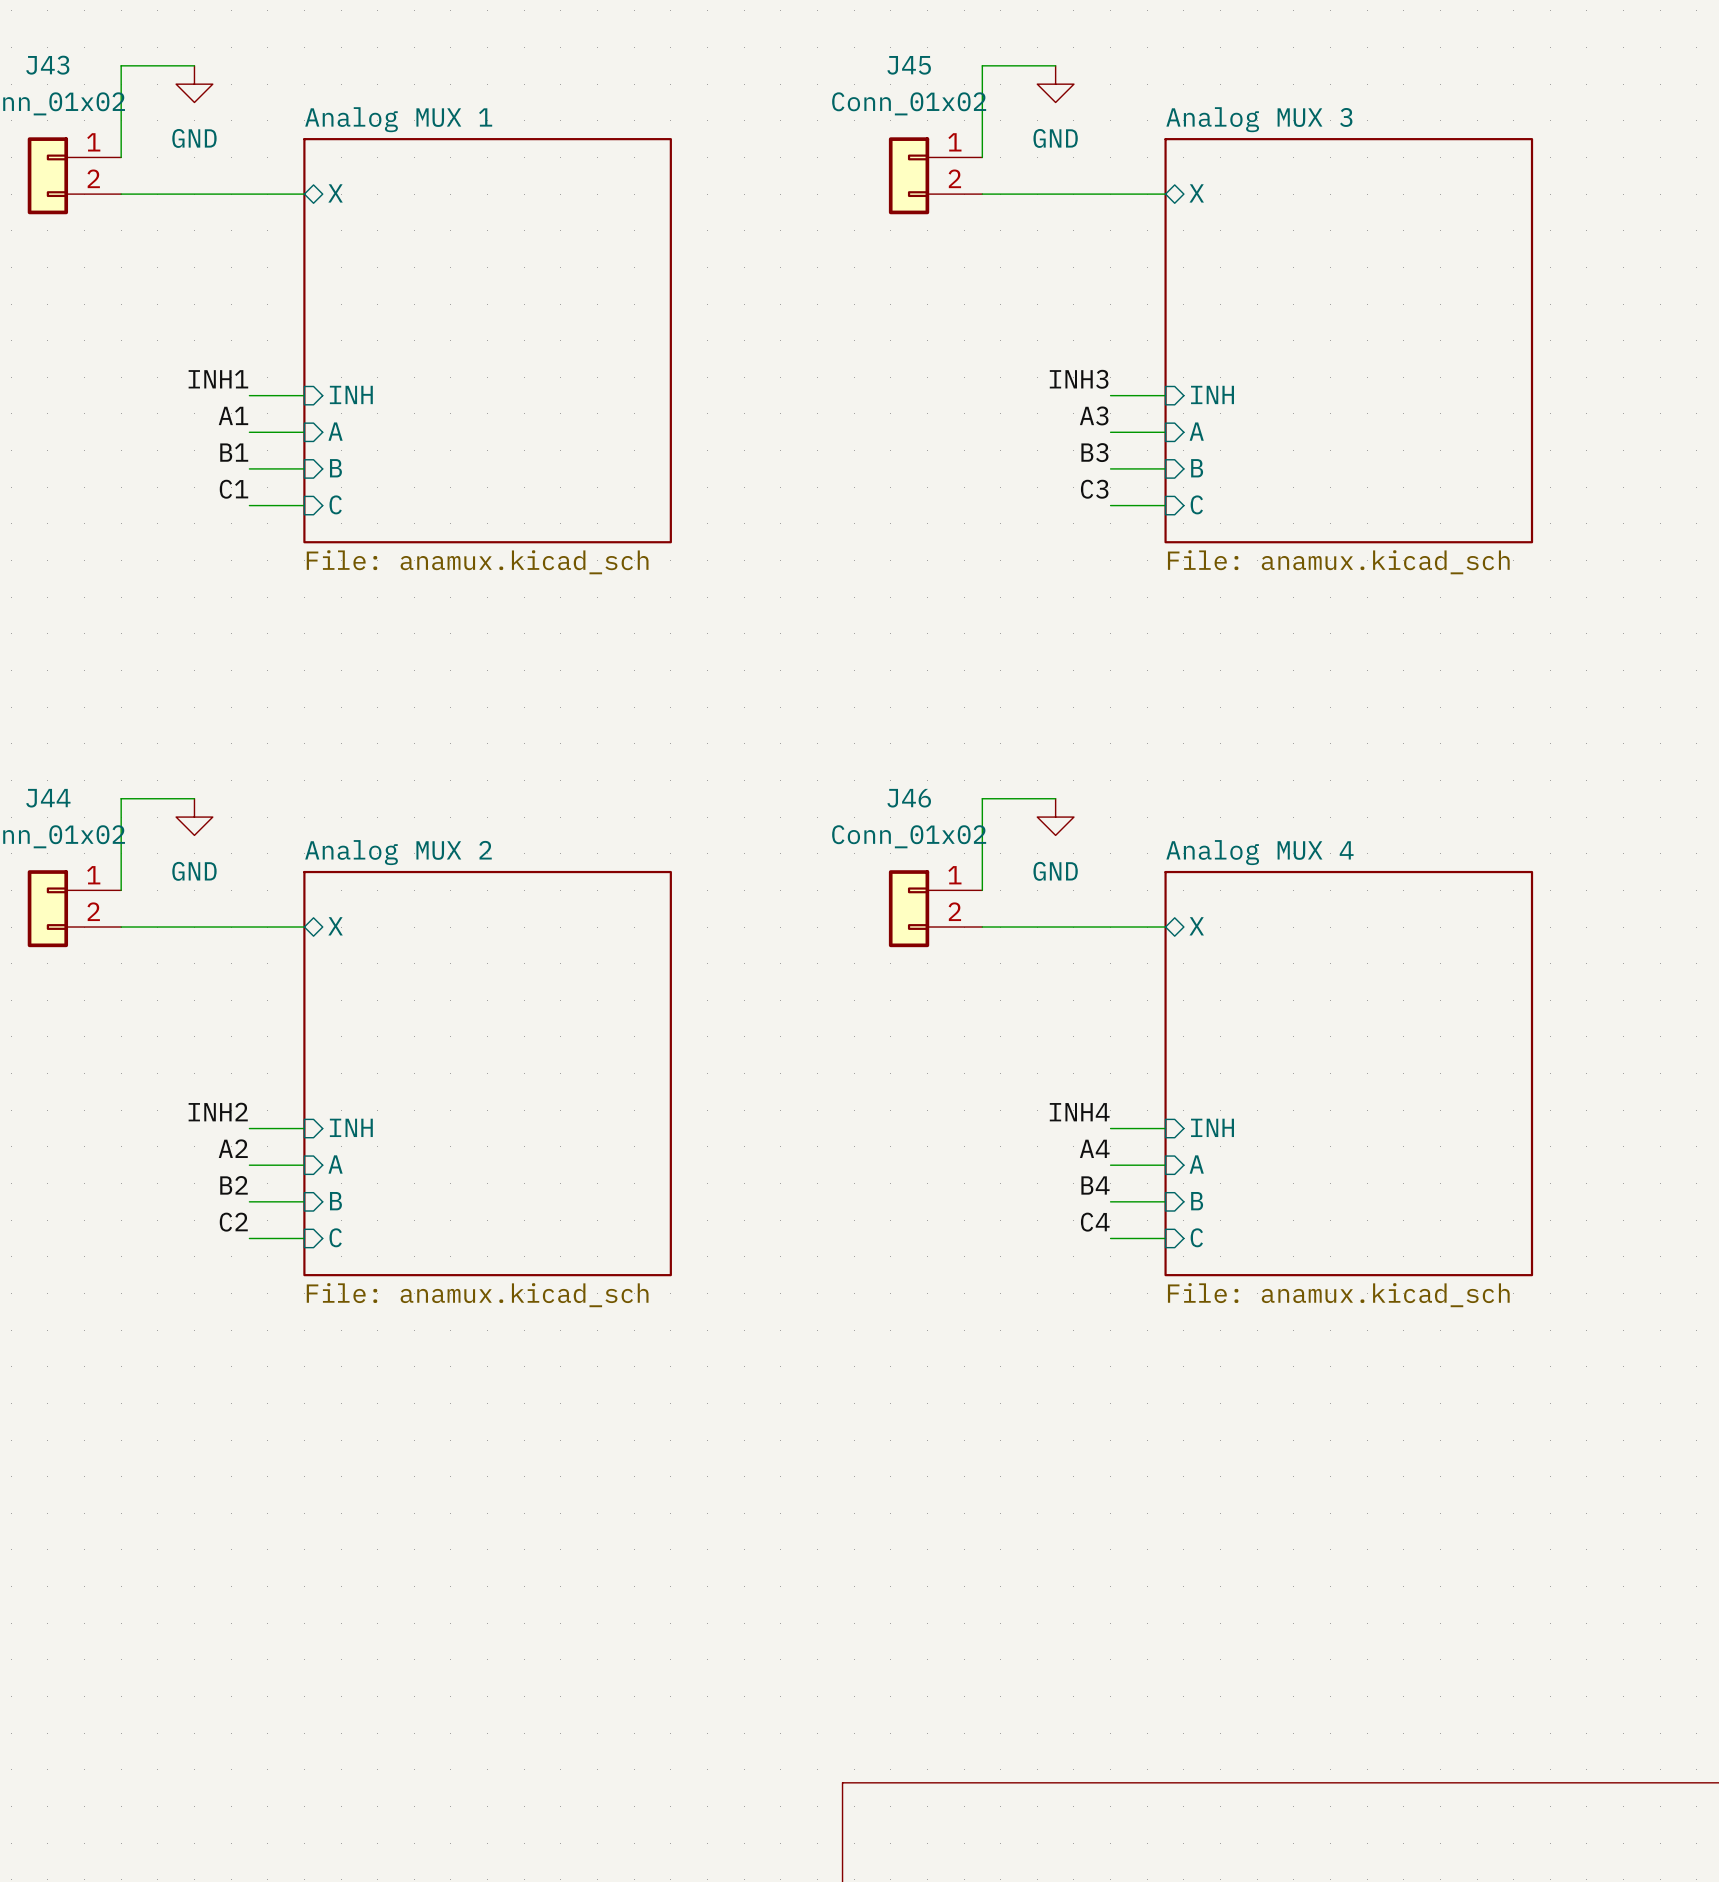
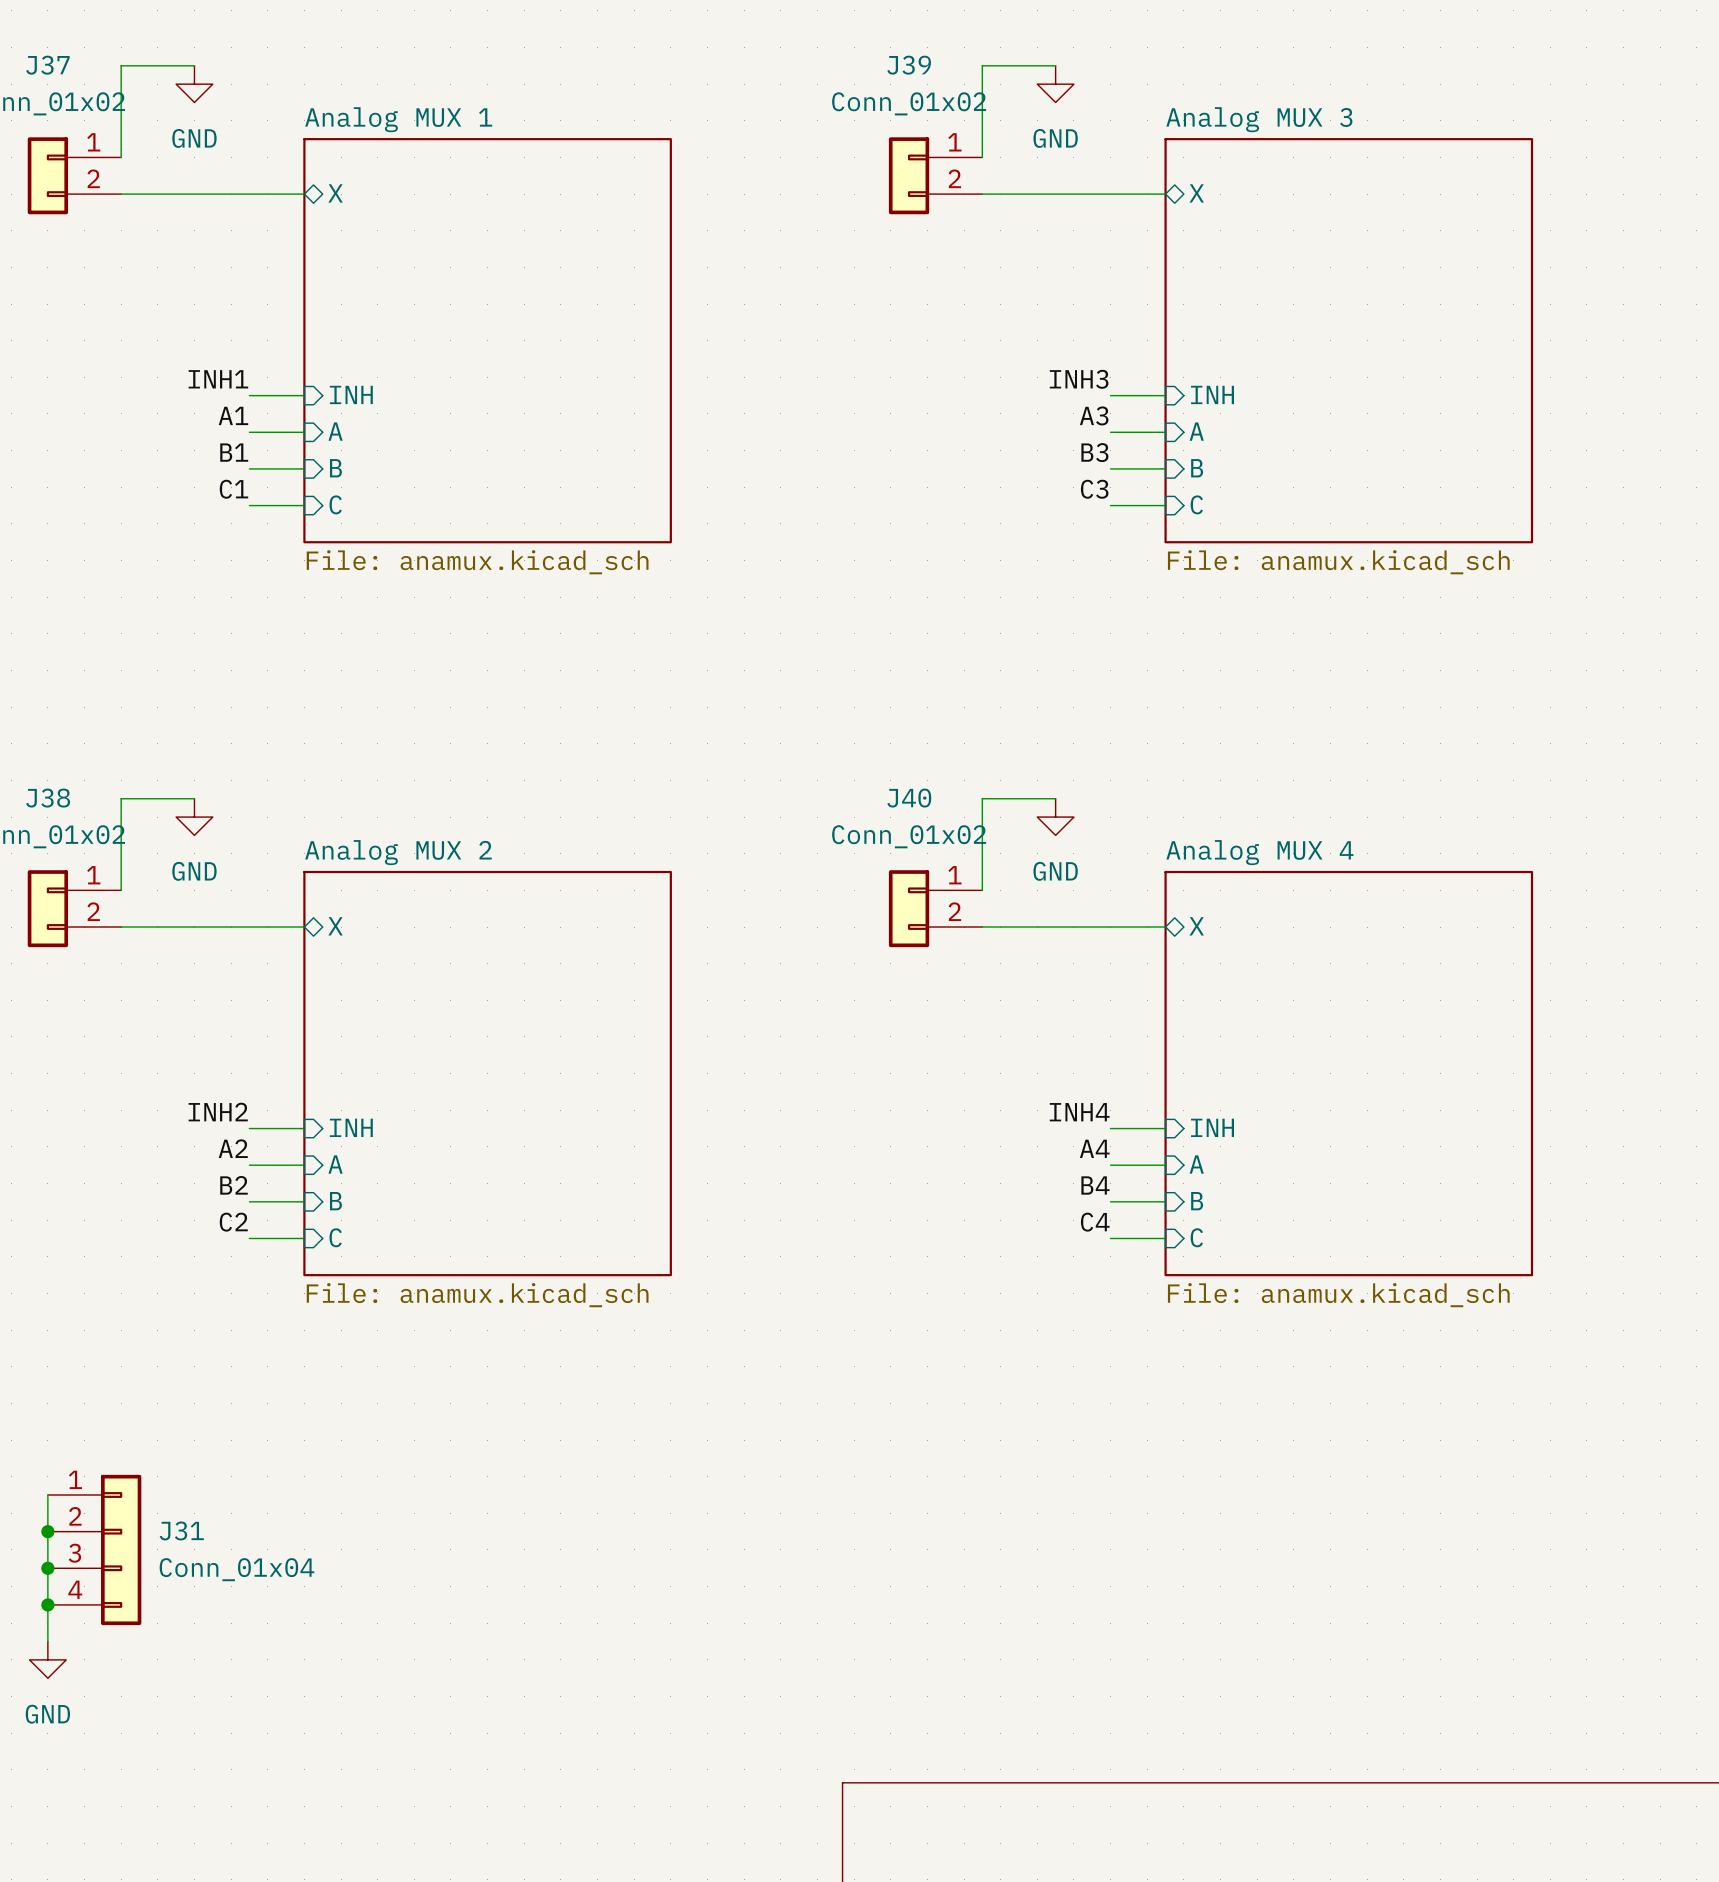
J43 name: J43 (47, 65) -> J37 (47, 65)
J45 name: J45 (909, 65) -> J39 (909, 65)
J44 name: J44 (48, 798) -> J38 (48, 798)
J46 name: J46 (909, 798) -> J40 (909, 798)
wire: none -> (47, 1495) (47, 1641)
junction: none -> (47, 1531)
J31: none -> Conn_01x04 (94, 1549)
junction: none -> (47, 1568)
junction: none -> (47, 1604)
power symbol: none -> GND (47, 1659)

